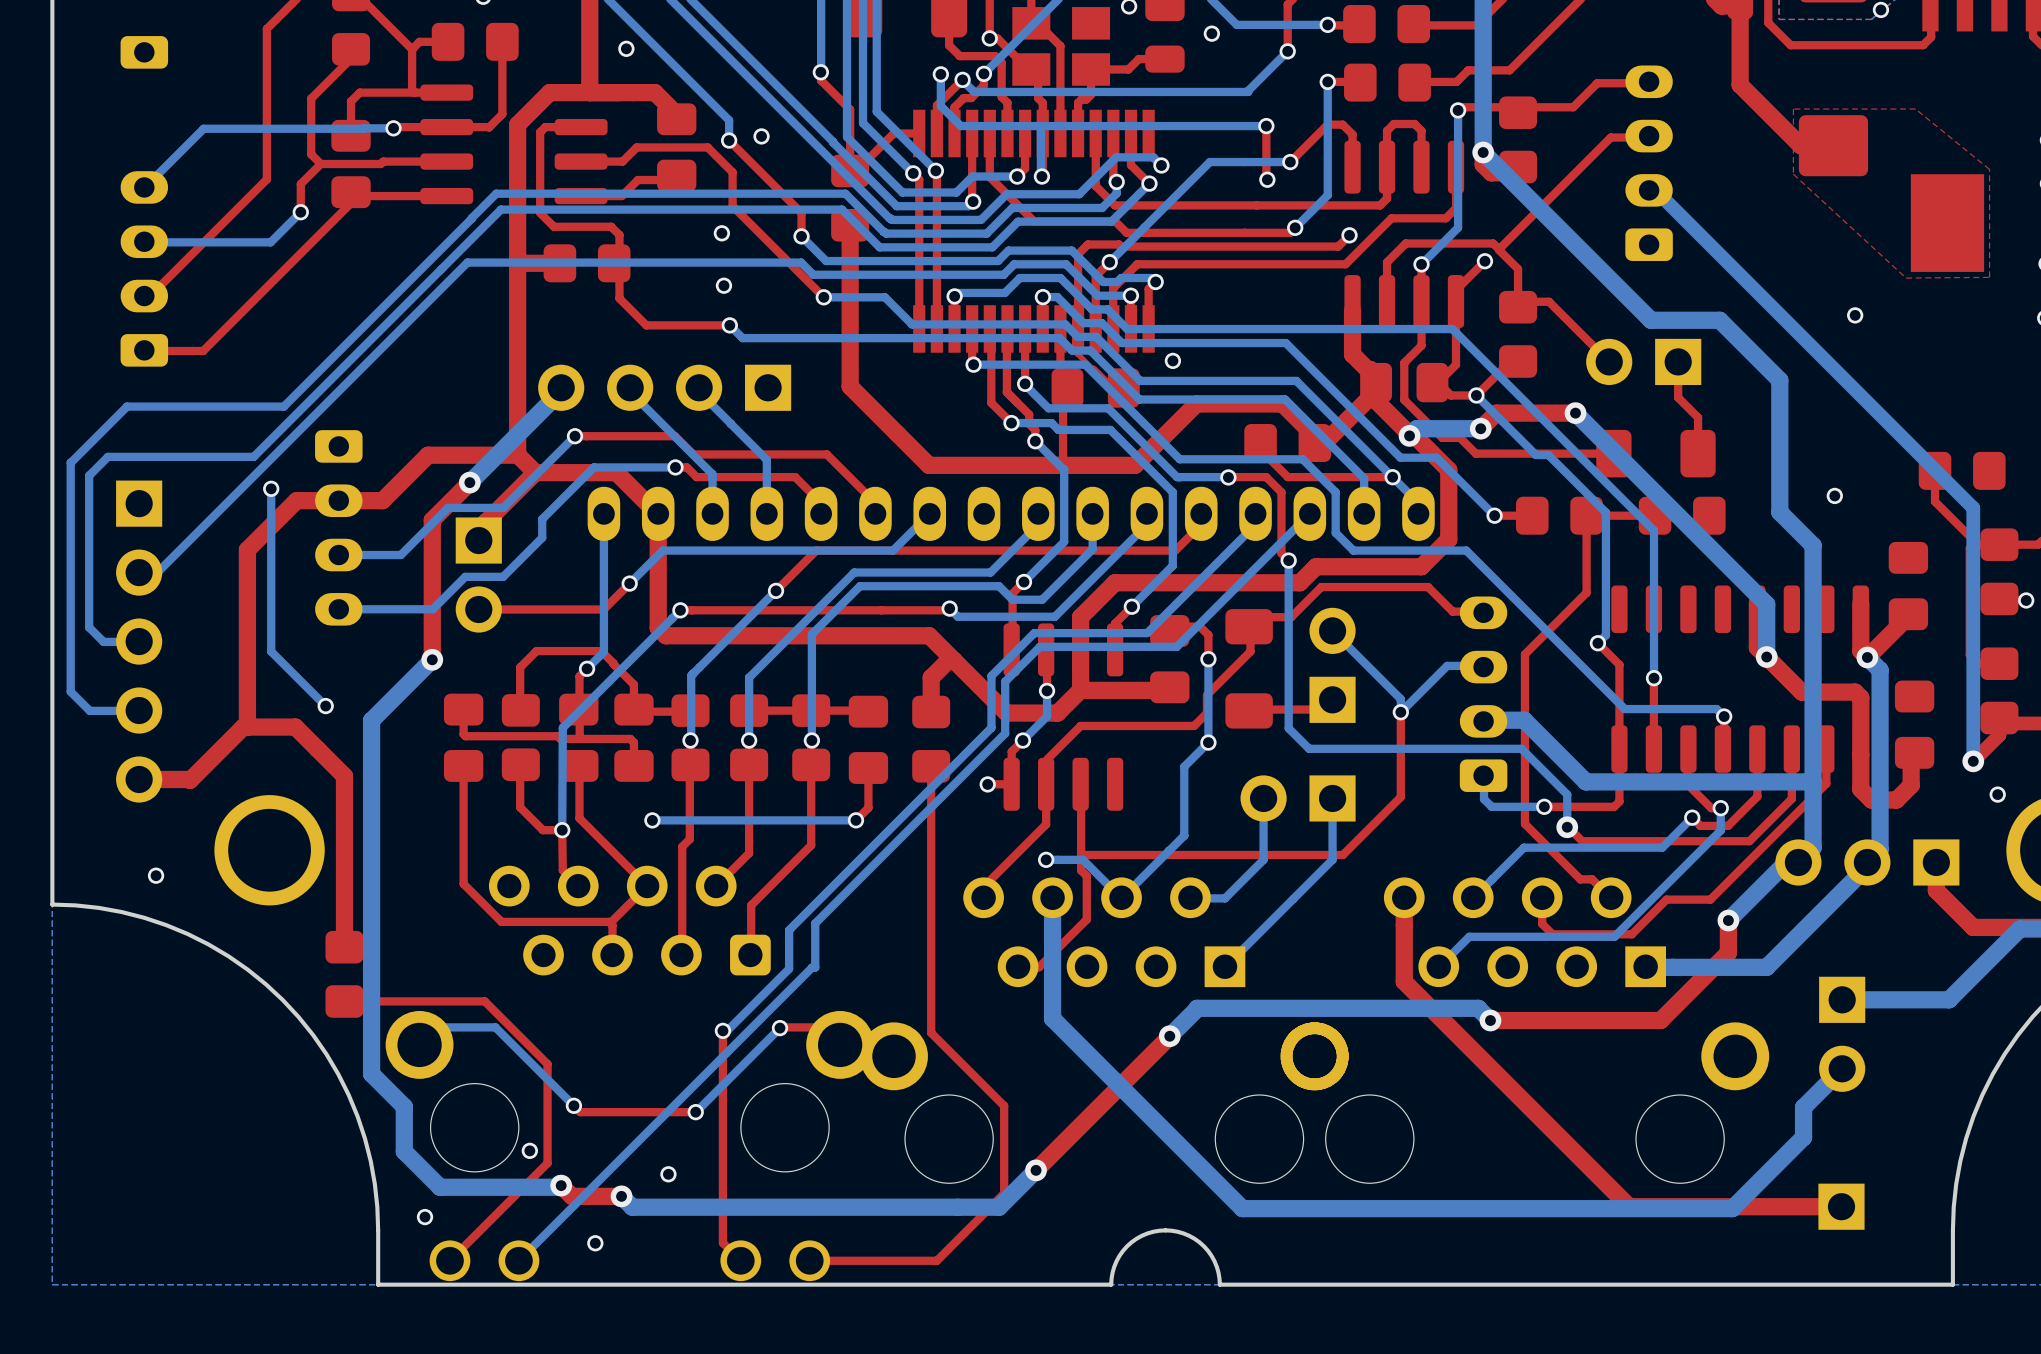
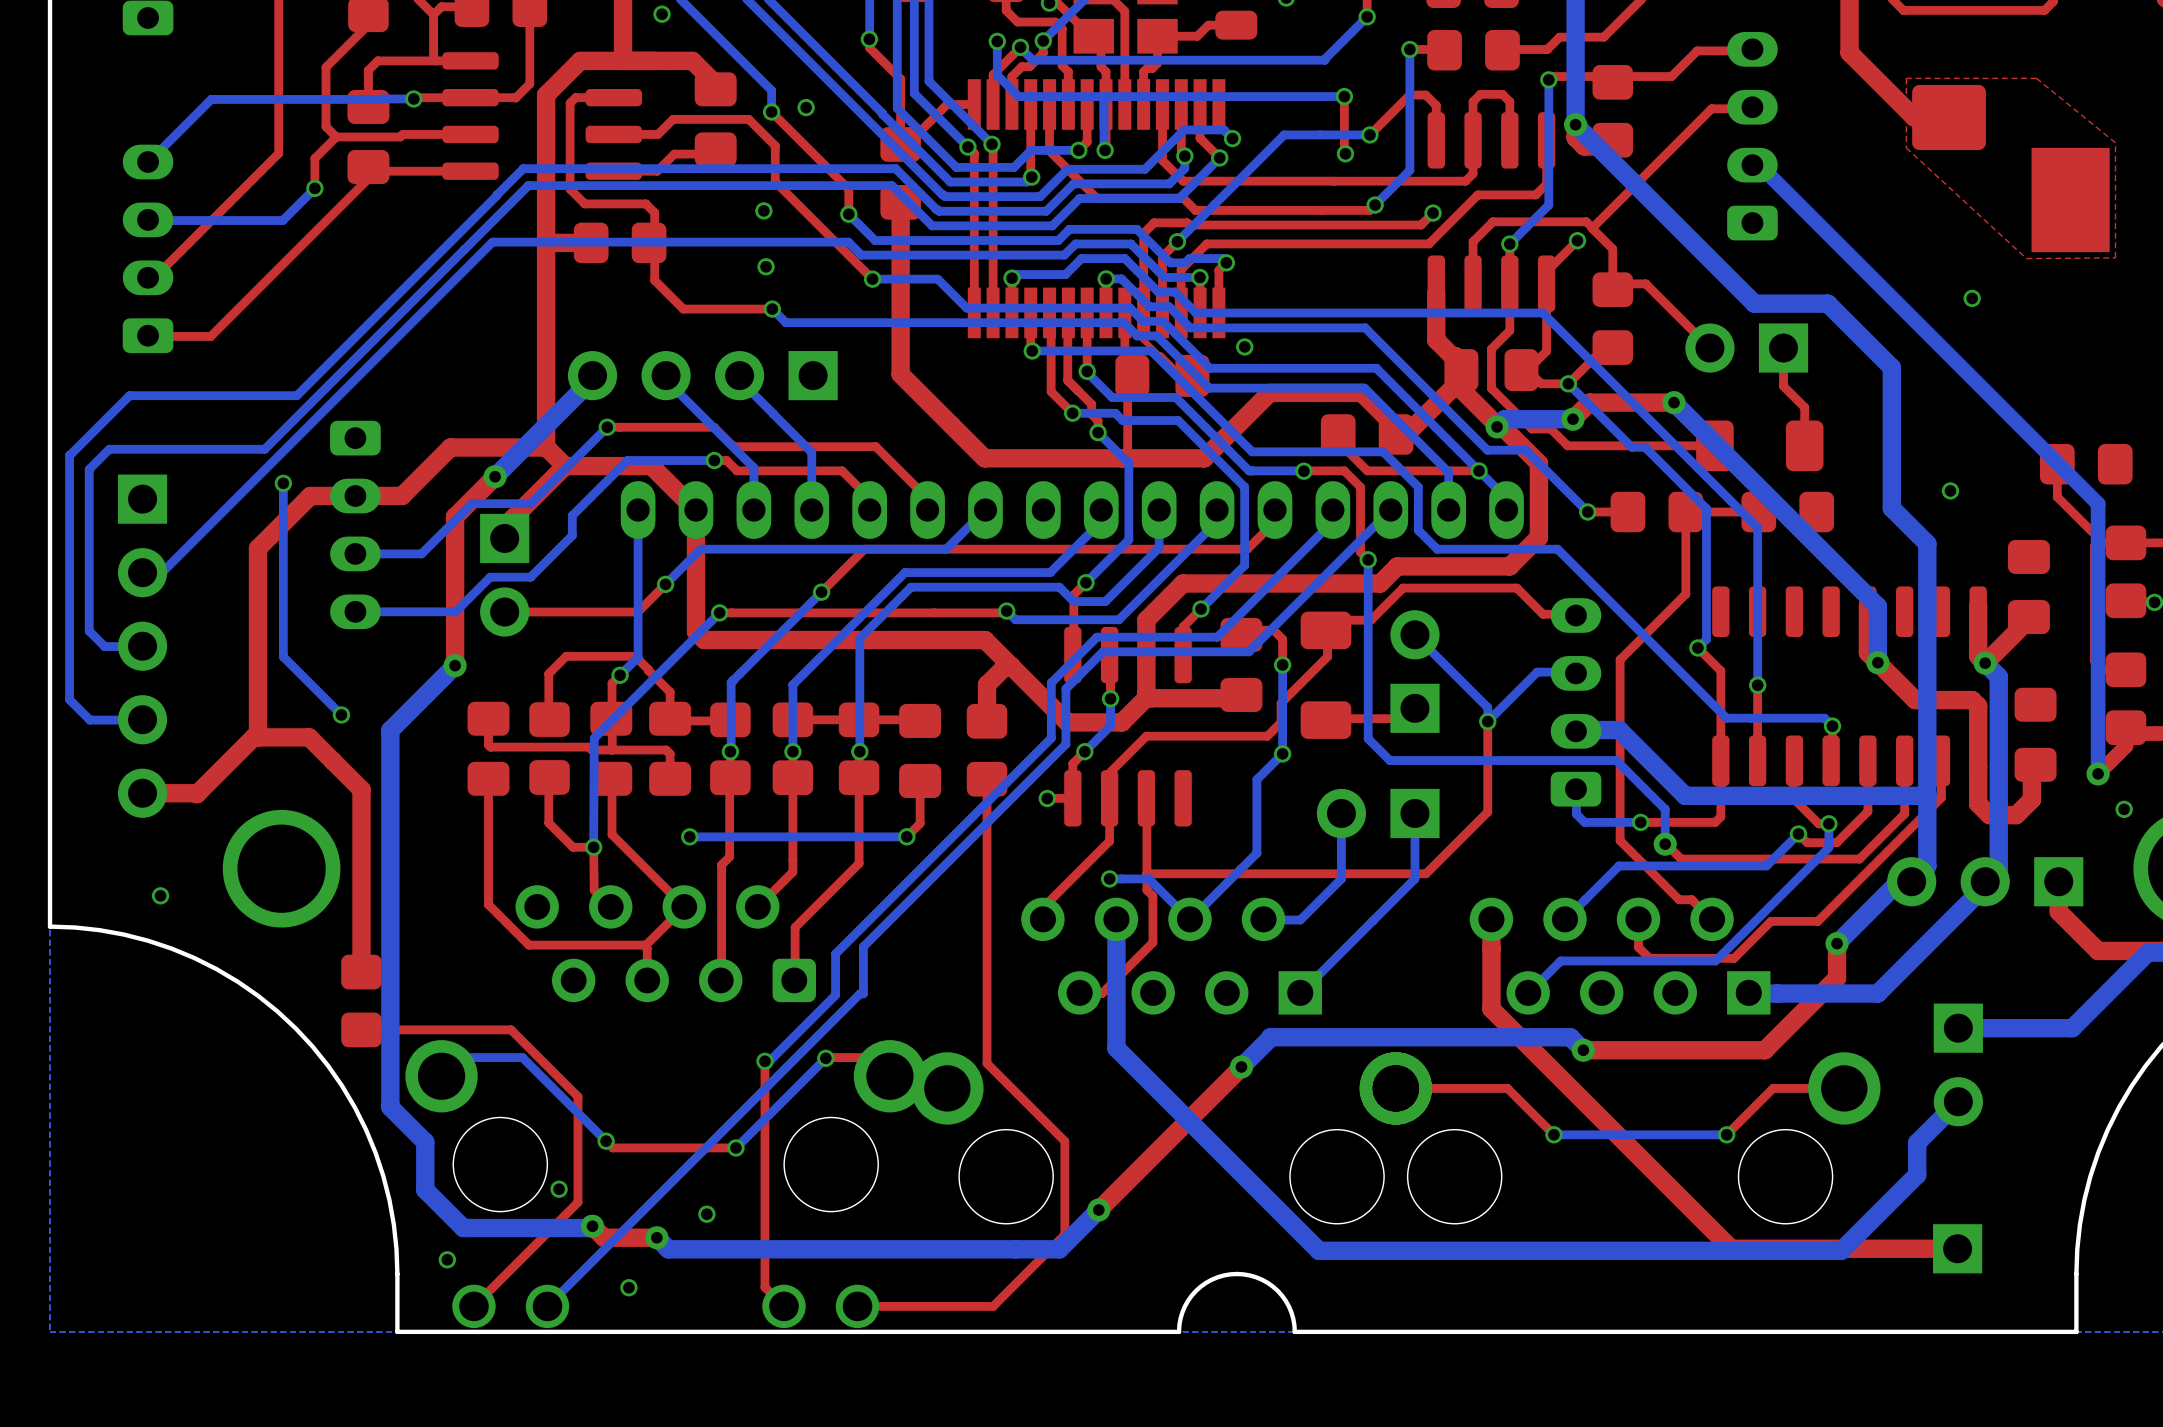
top track: none -> (1395, 1088) (1507, 1088) (1553, 1134)
top track: none -> (1844, 1088) (1773, 1088) (1726, 1134)
via: none -> (1553, 1134)
bottom track: none -> (1726, 1134) (1553, 1134)
via: none -> (1726, 1134)

